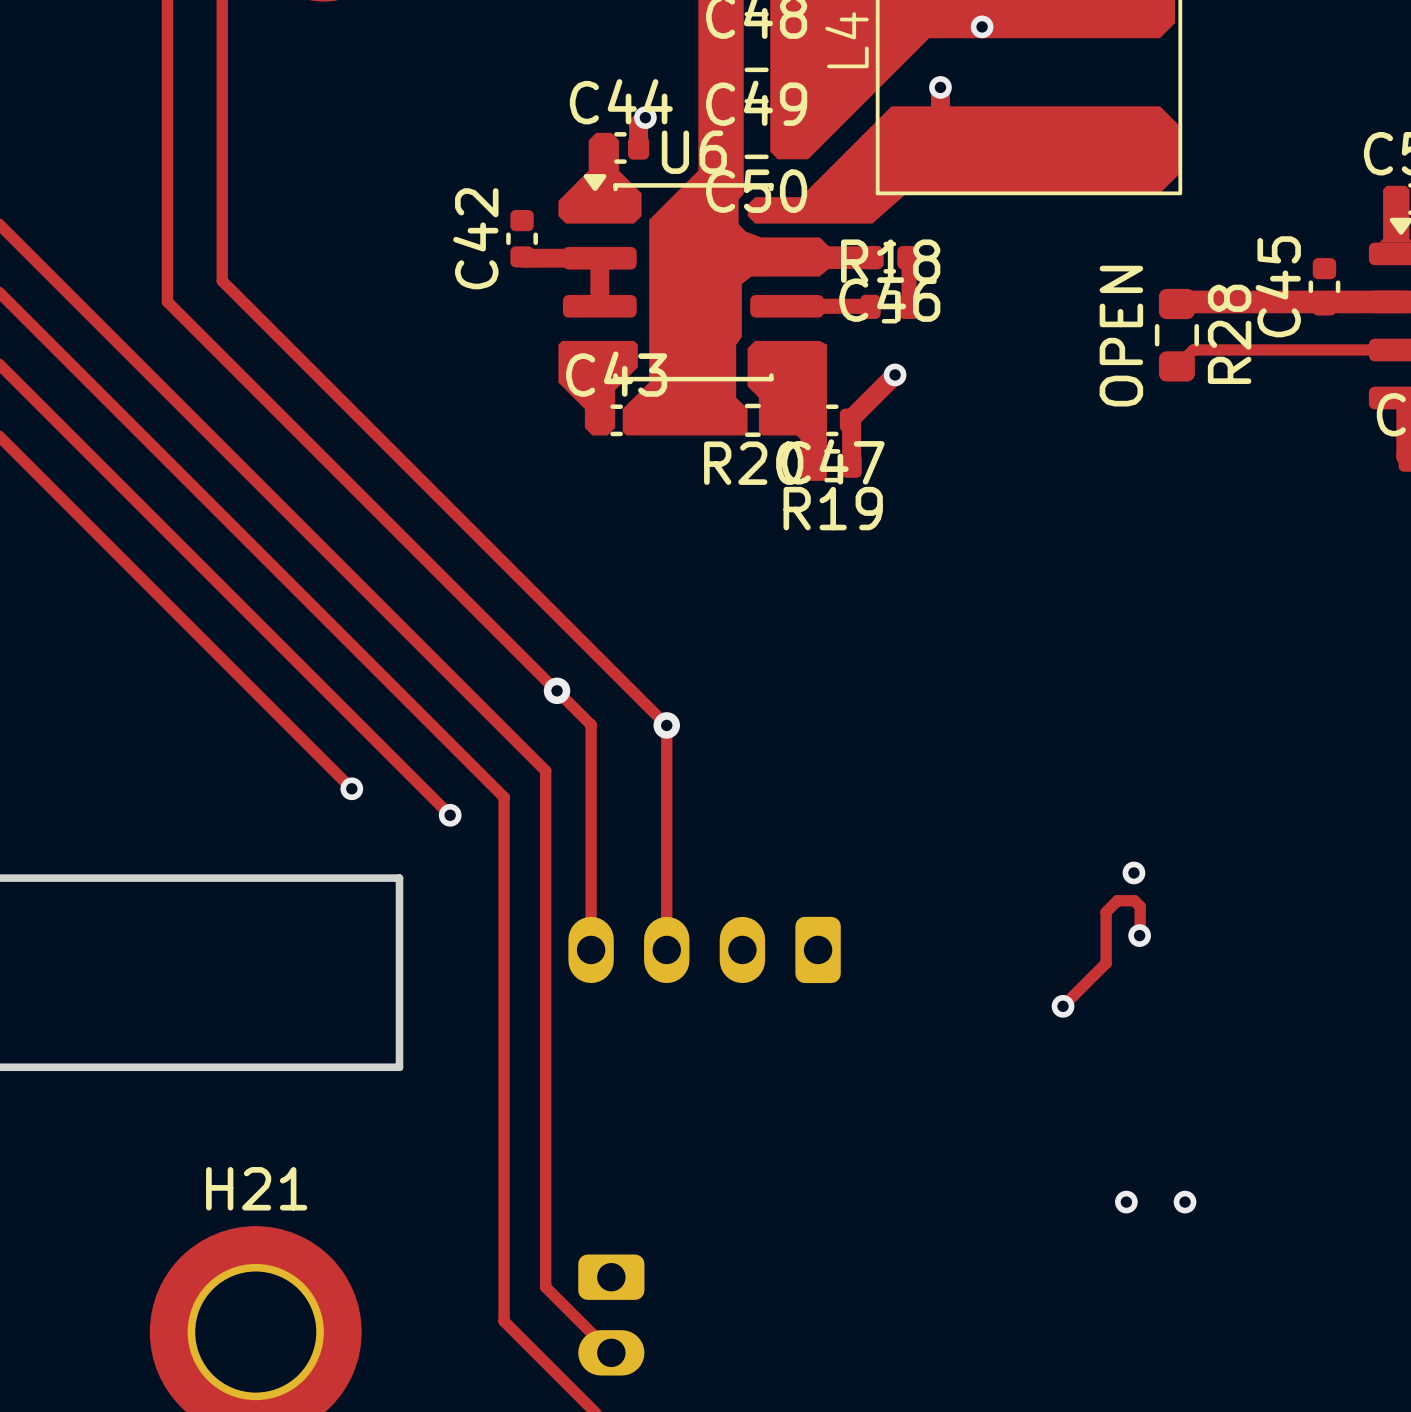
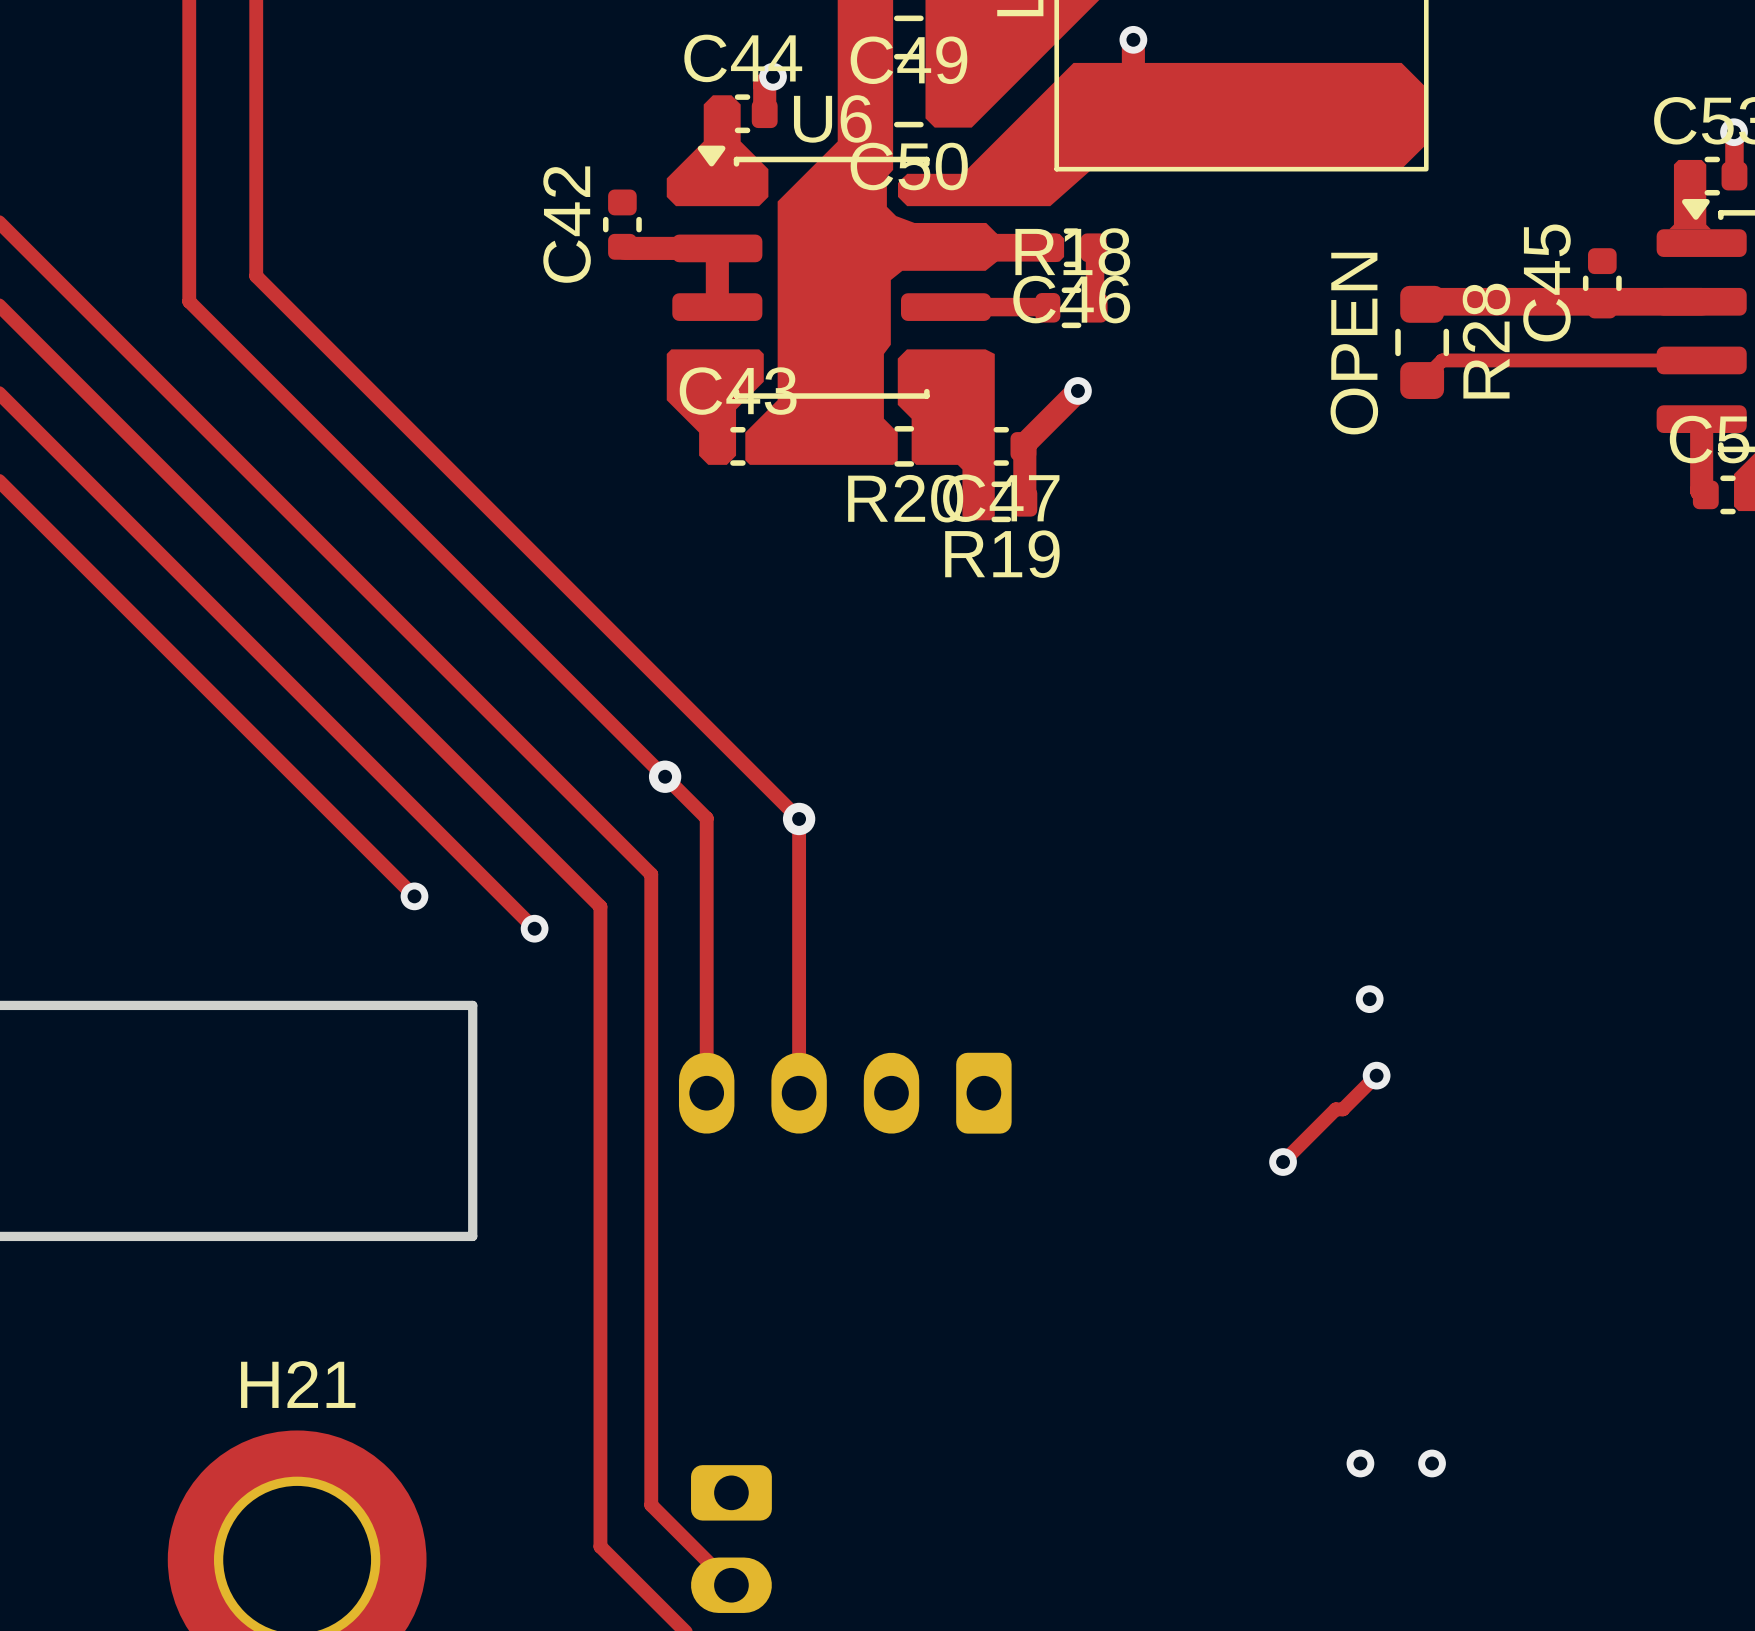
track: (1139, 935) (1140, 906) (1134, 900) (1117, 900) (1106, 912) (1106, 963) -> (1376, 1075) (1342, 1109) (1335, 1109)
via: (1126, 1202) -> none
via: (1185, 1202) -> none
via: none -> (1360, 1463)
via: none -> (1432, 1463)

